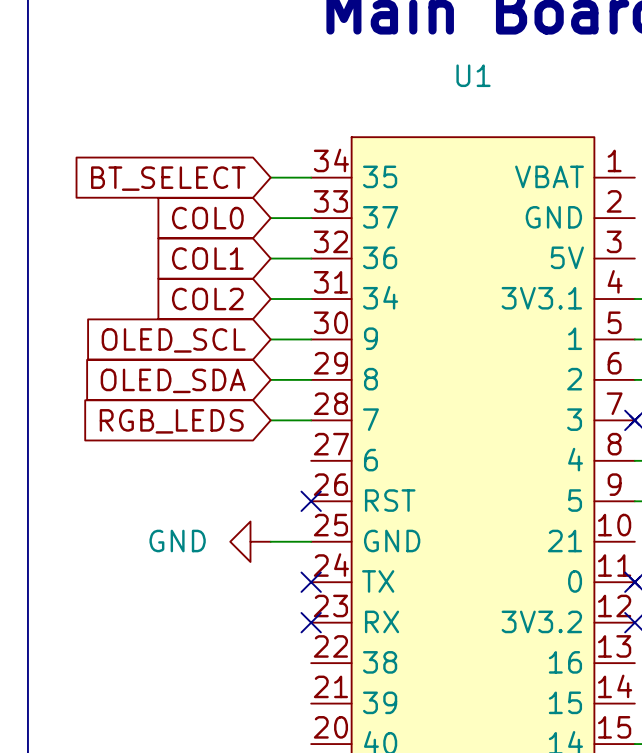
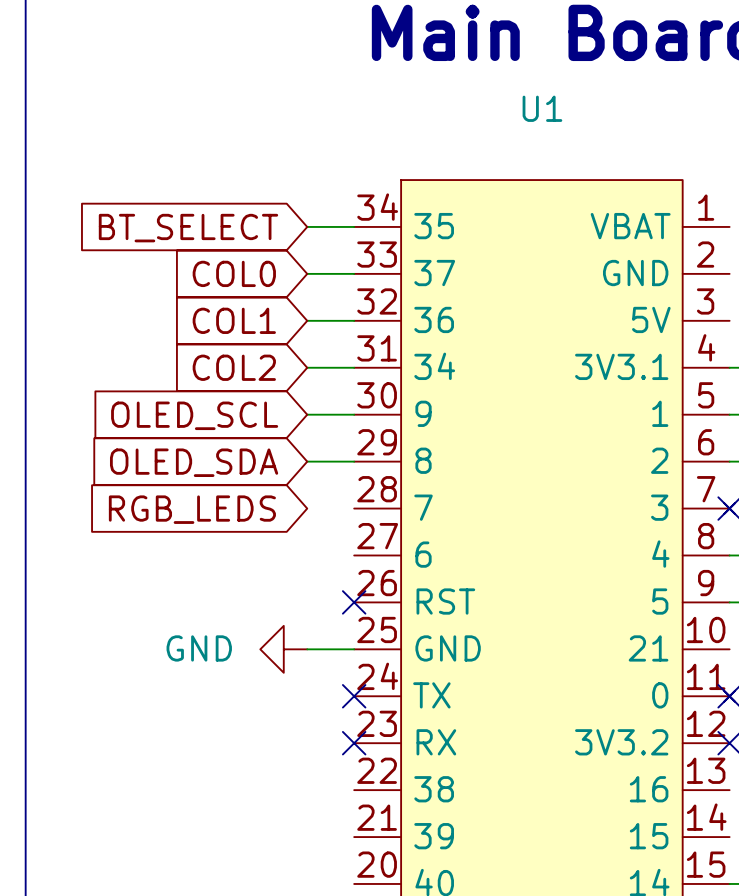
wire: (270, 420) (311, 420) -> none

